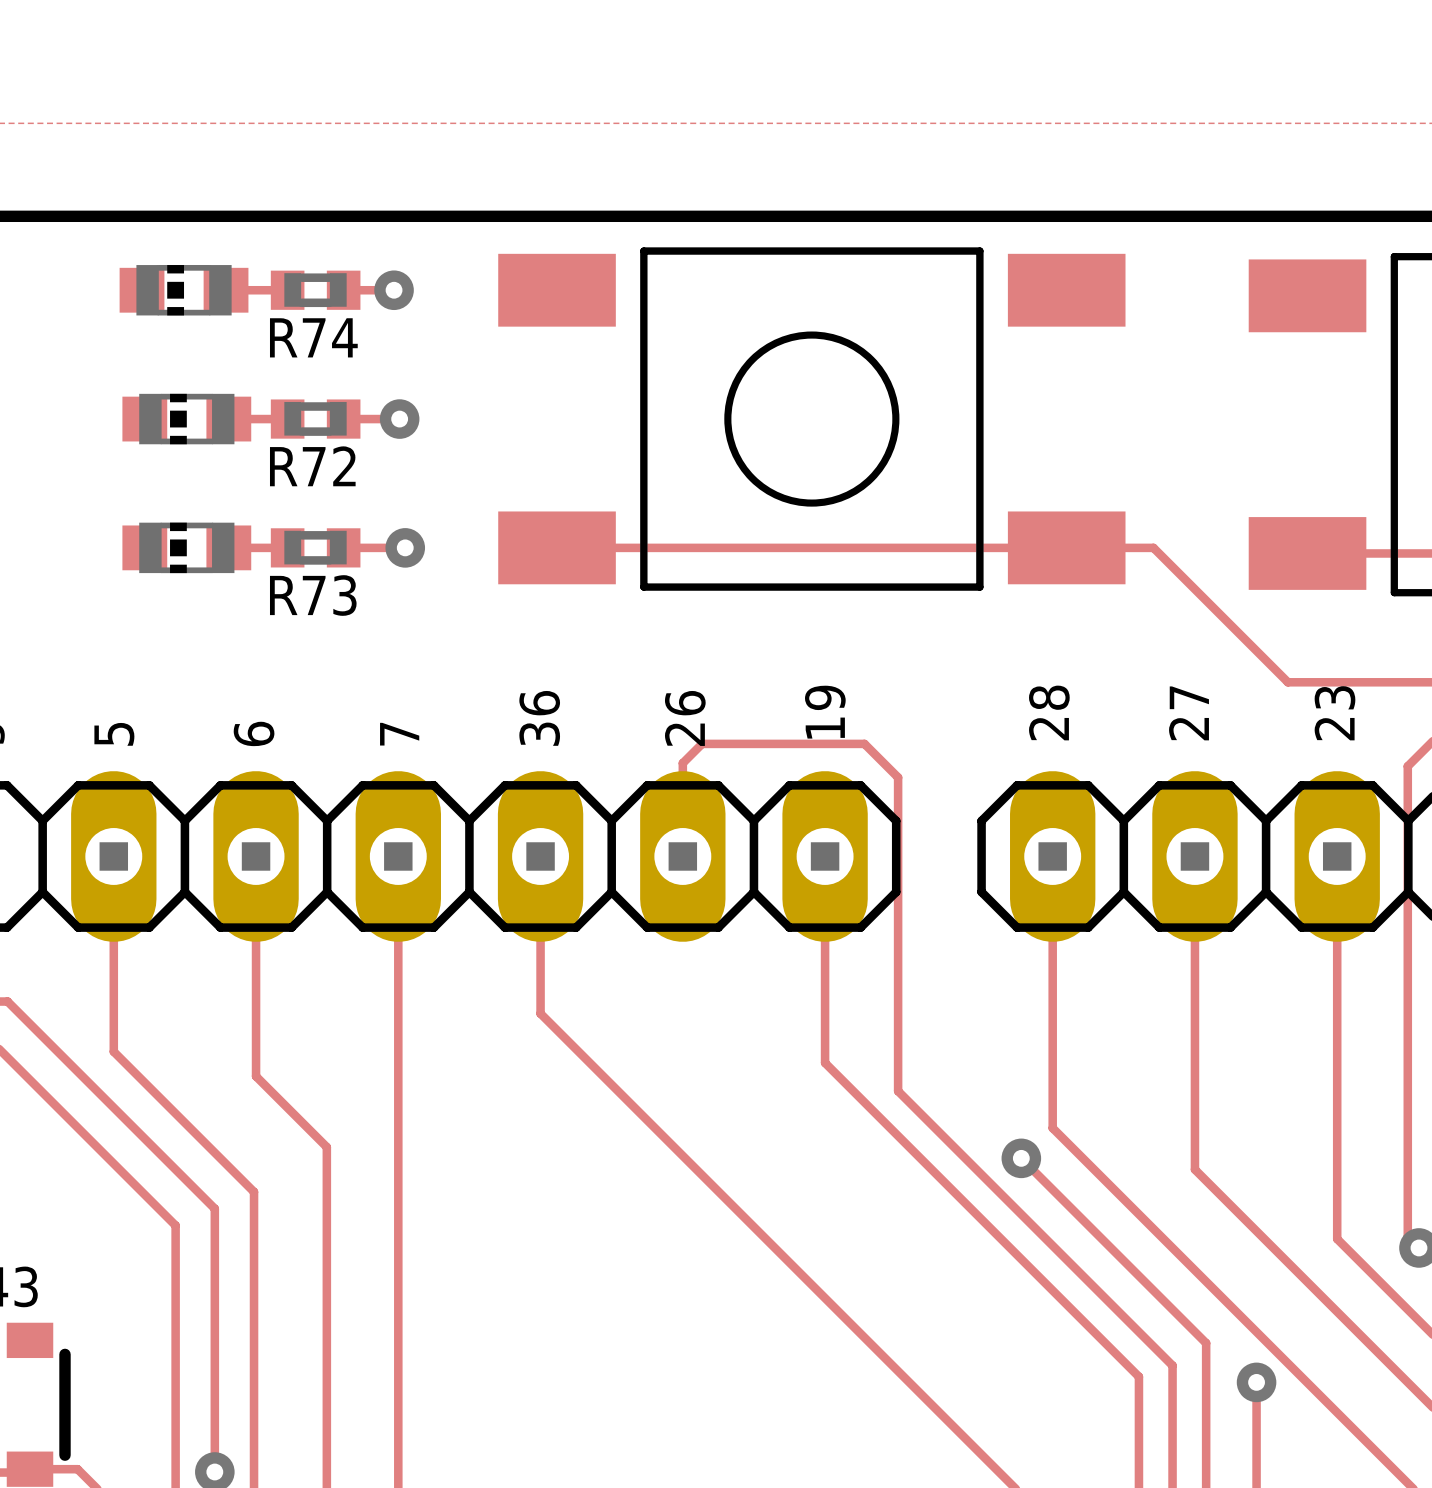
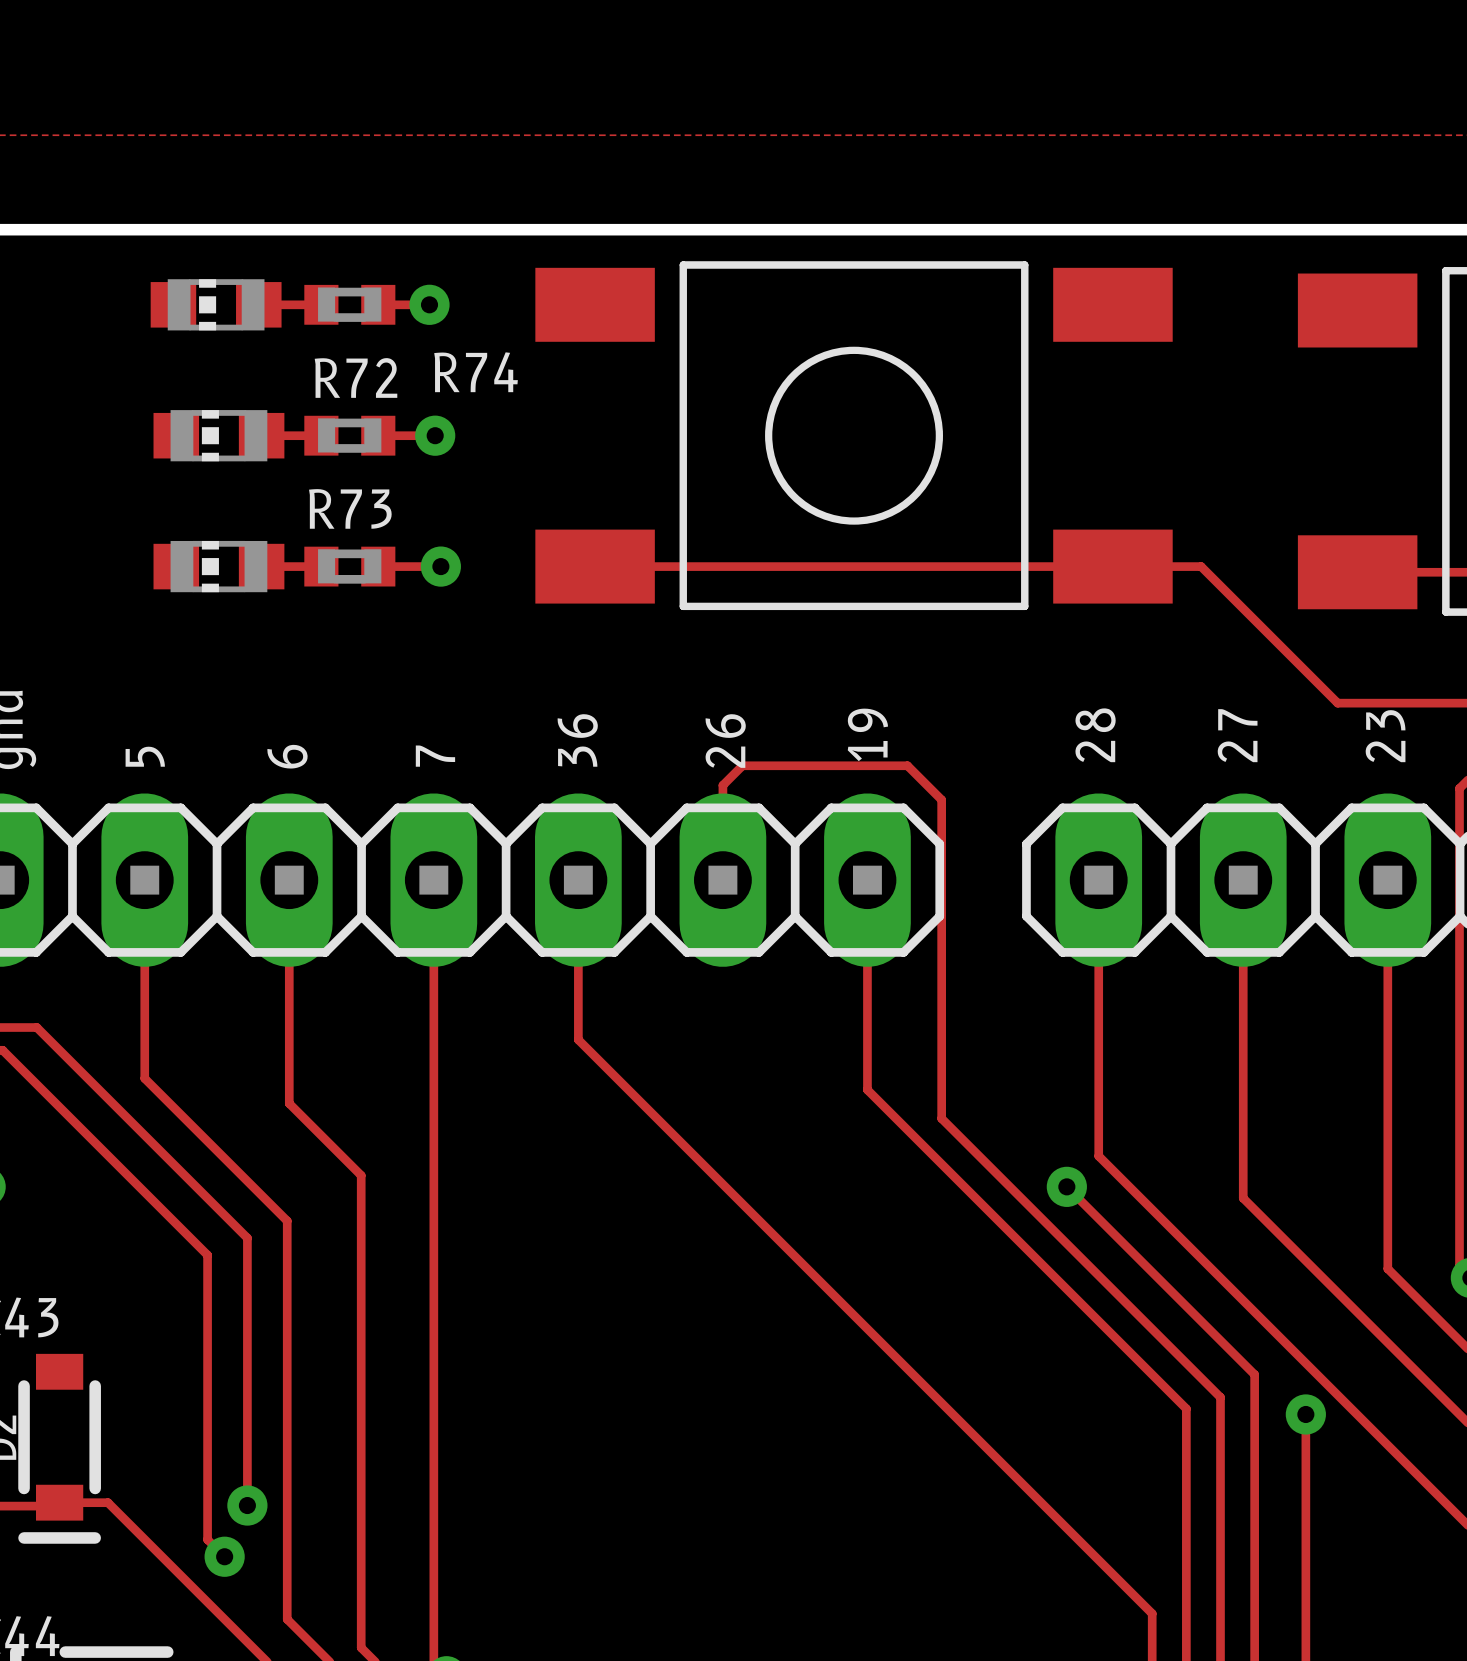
R74 name position: R74 (313, 337) -> R74 (476, 372)
R72 name position: R72 (312, 466) -> R72 (356, 377)
R73 name position: R73 (313, 595) -> R73 (350, 508)

